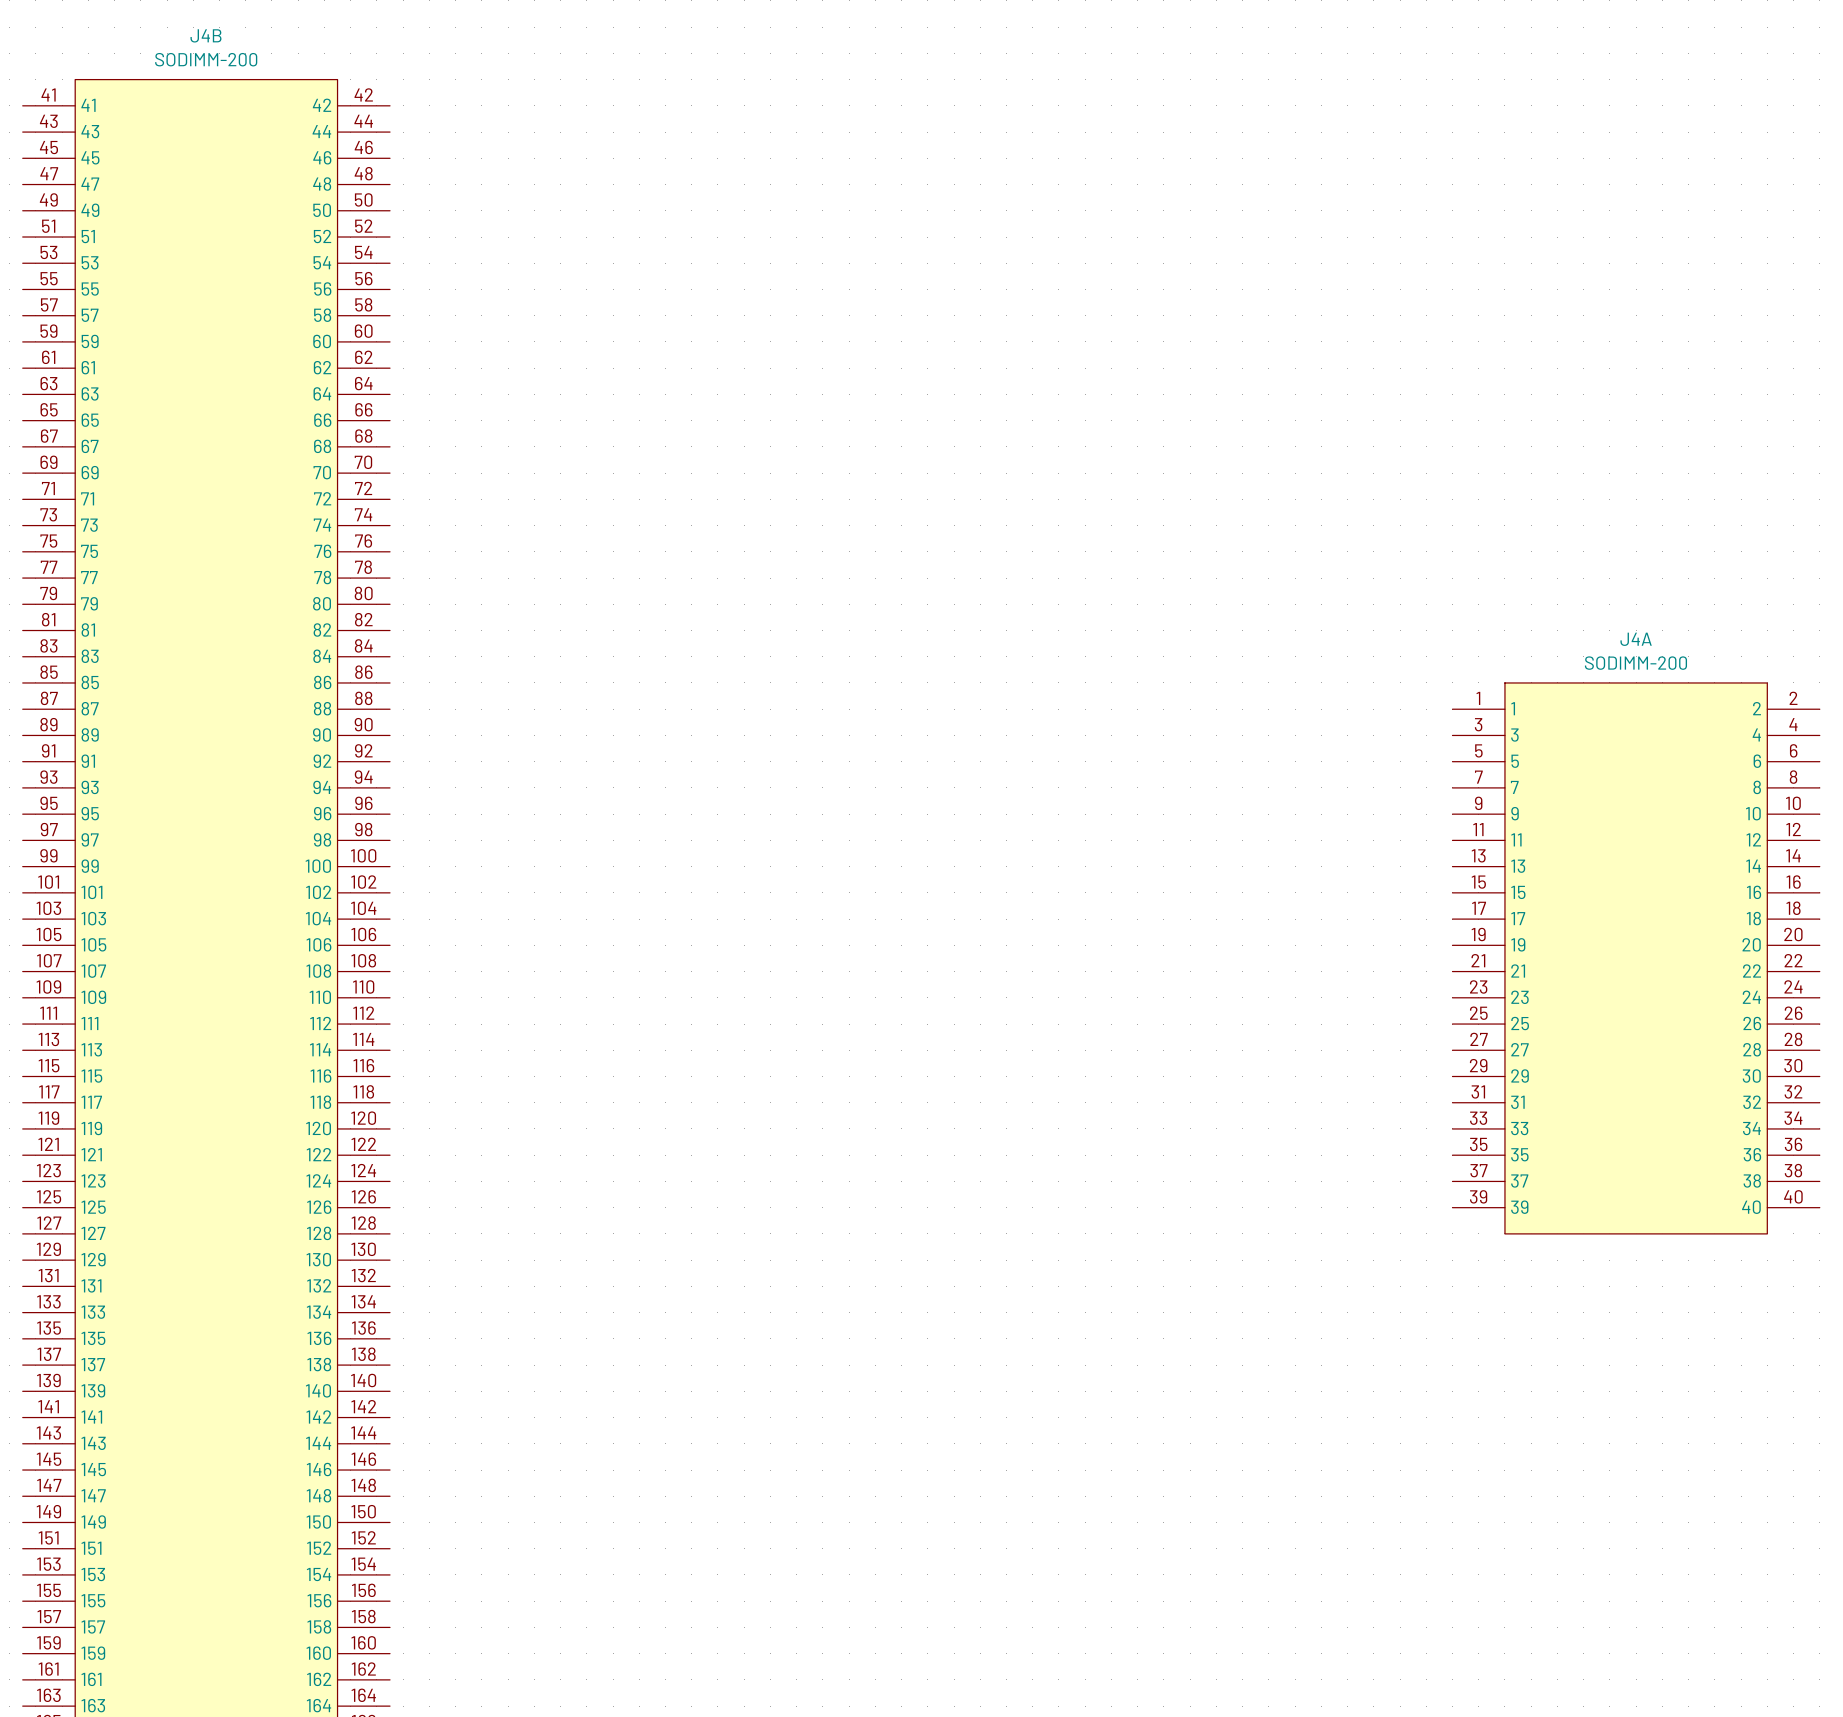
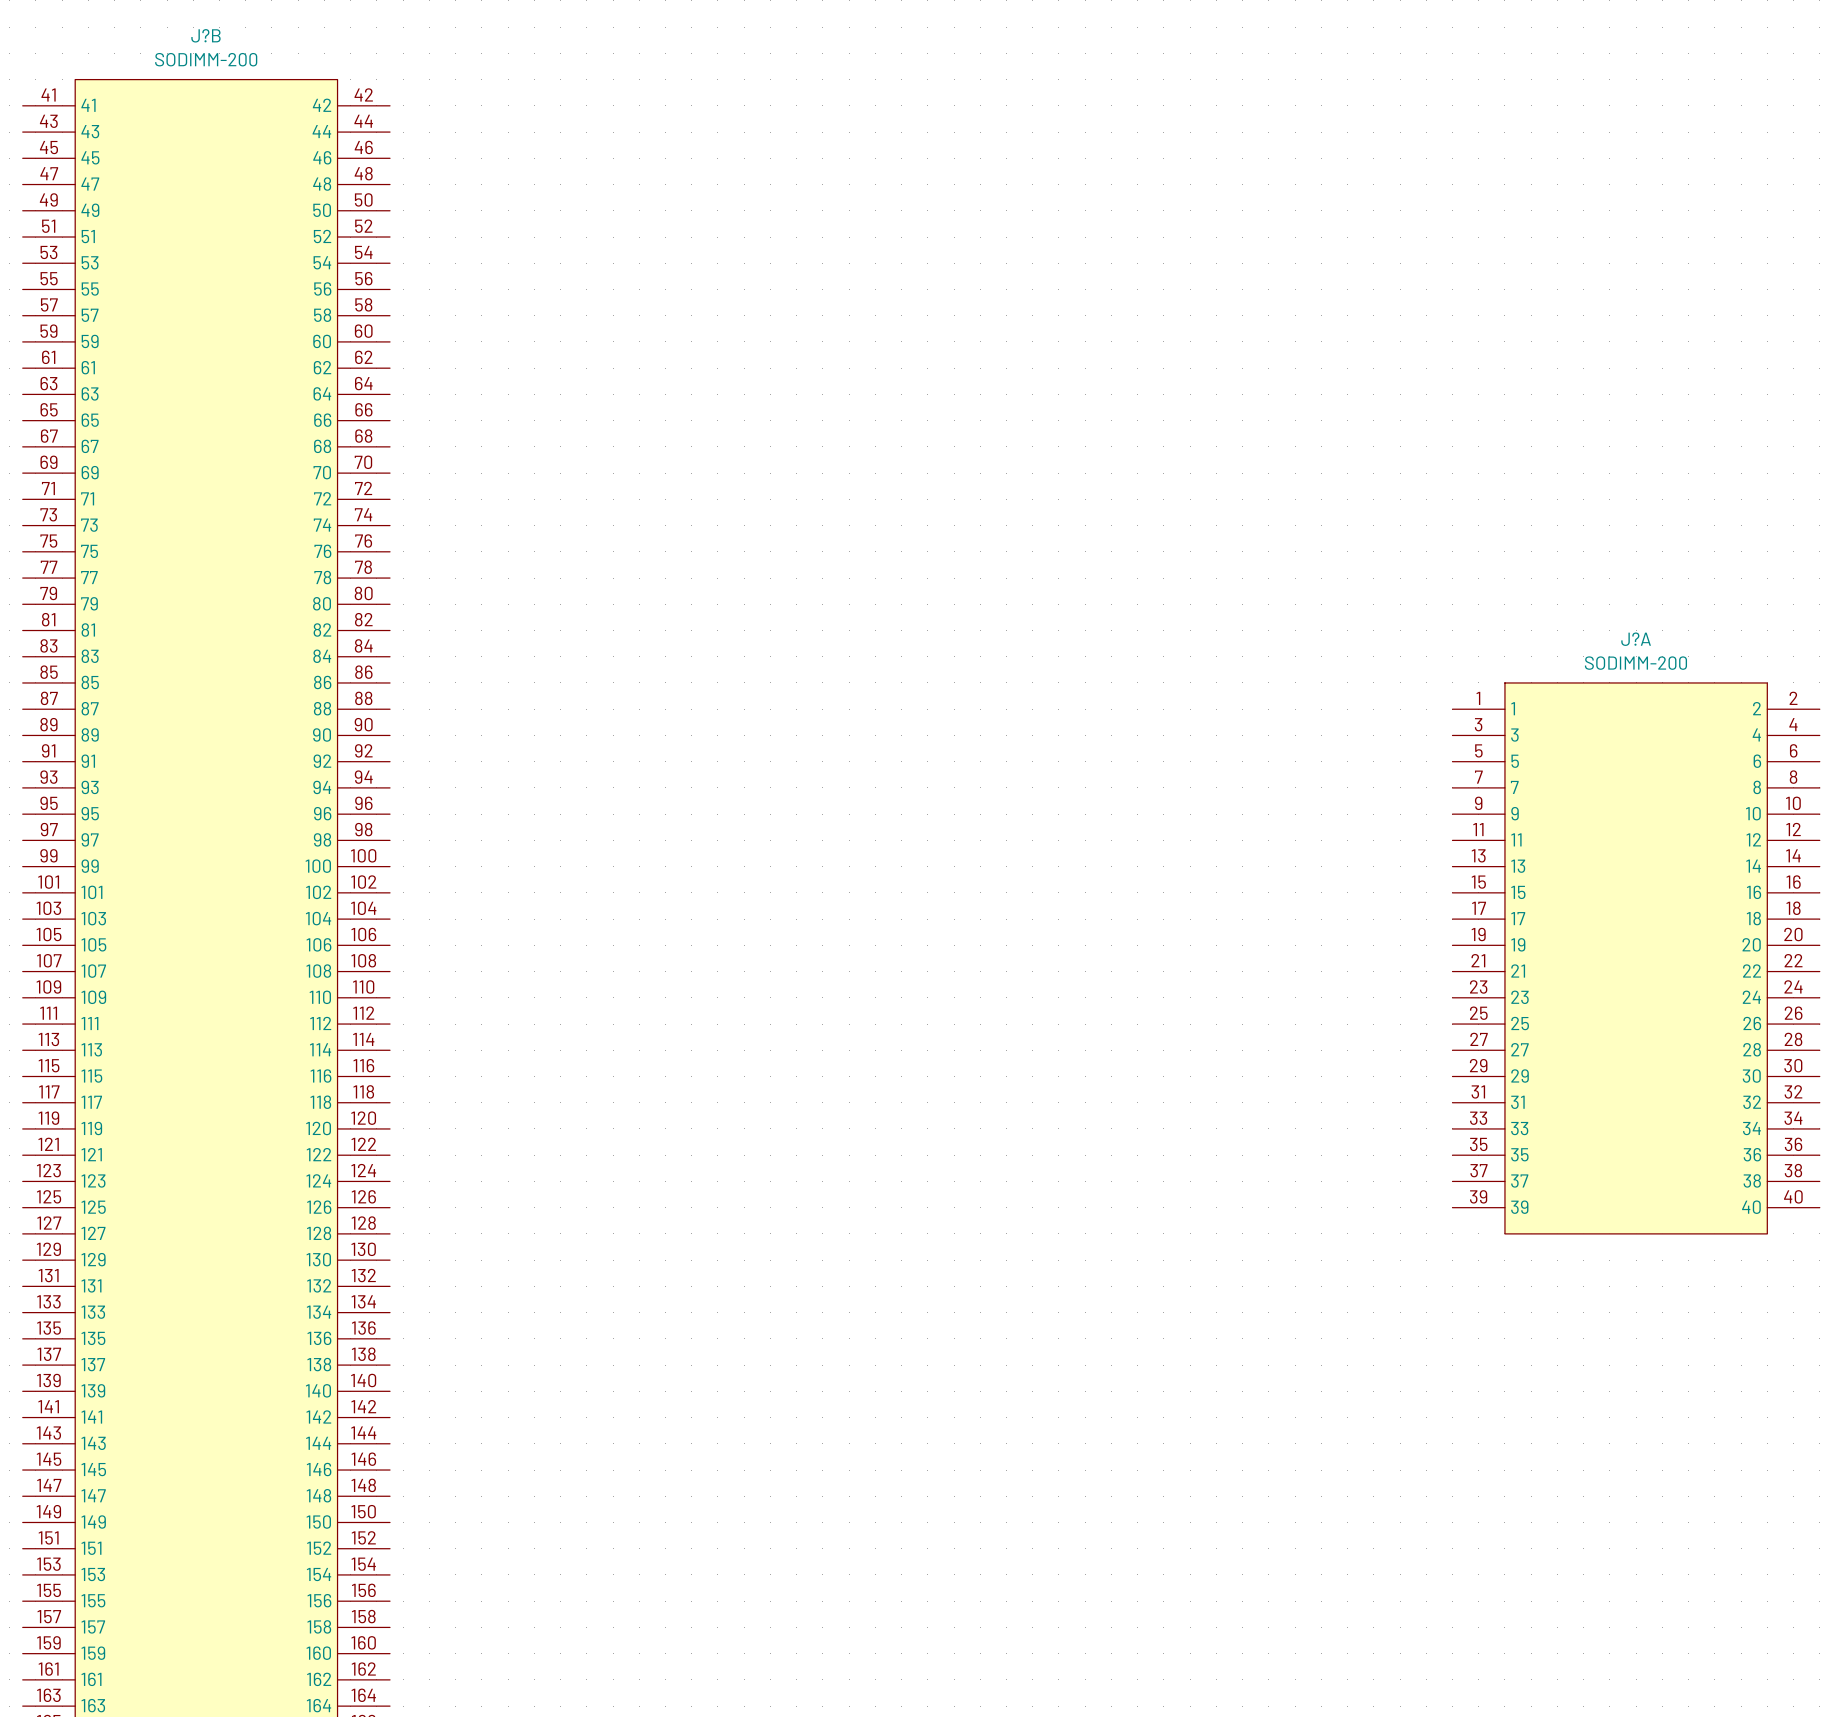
J4B name: J4B (205, 35) -> J?B (205, 35)
J4A name: J4A (1636, 639) -> J?A (1636, 639)

